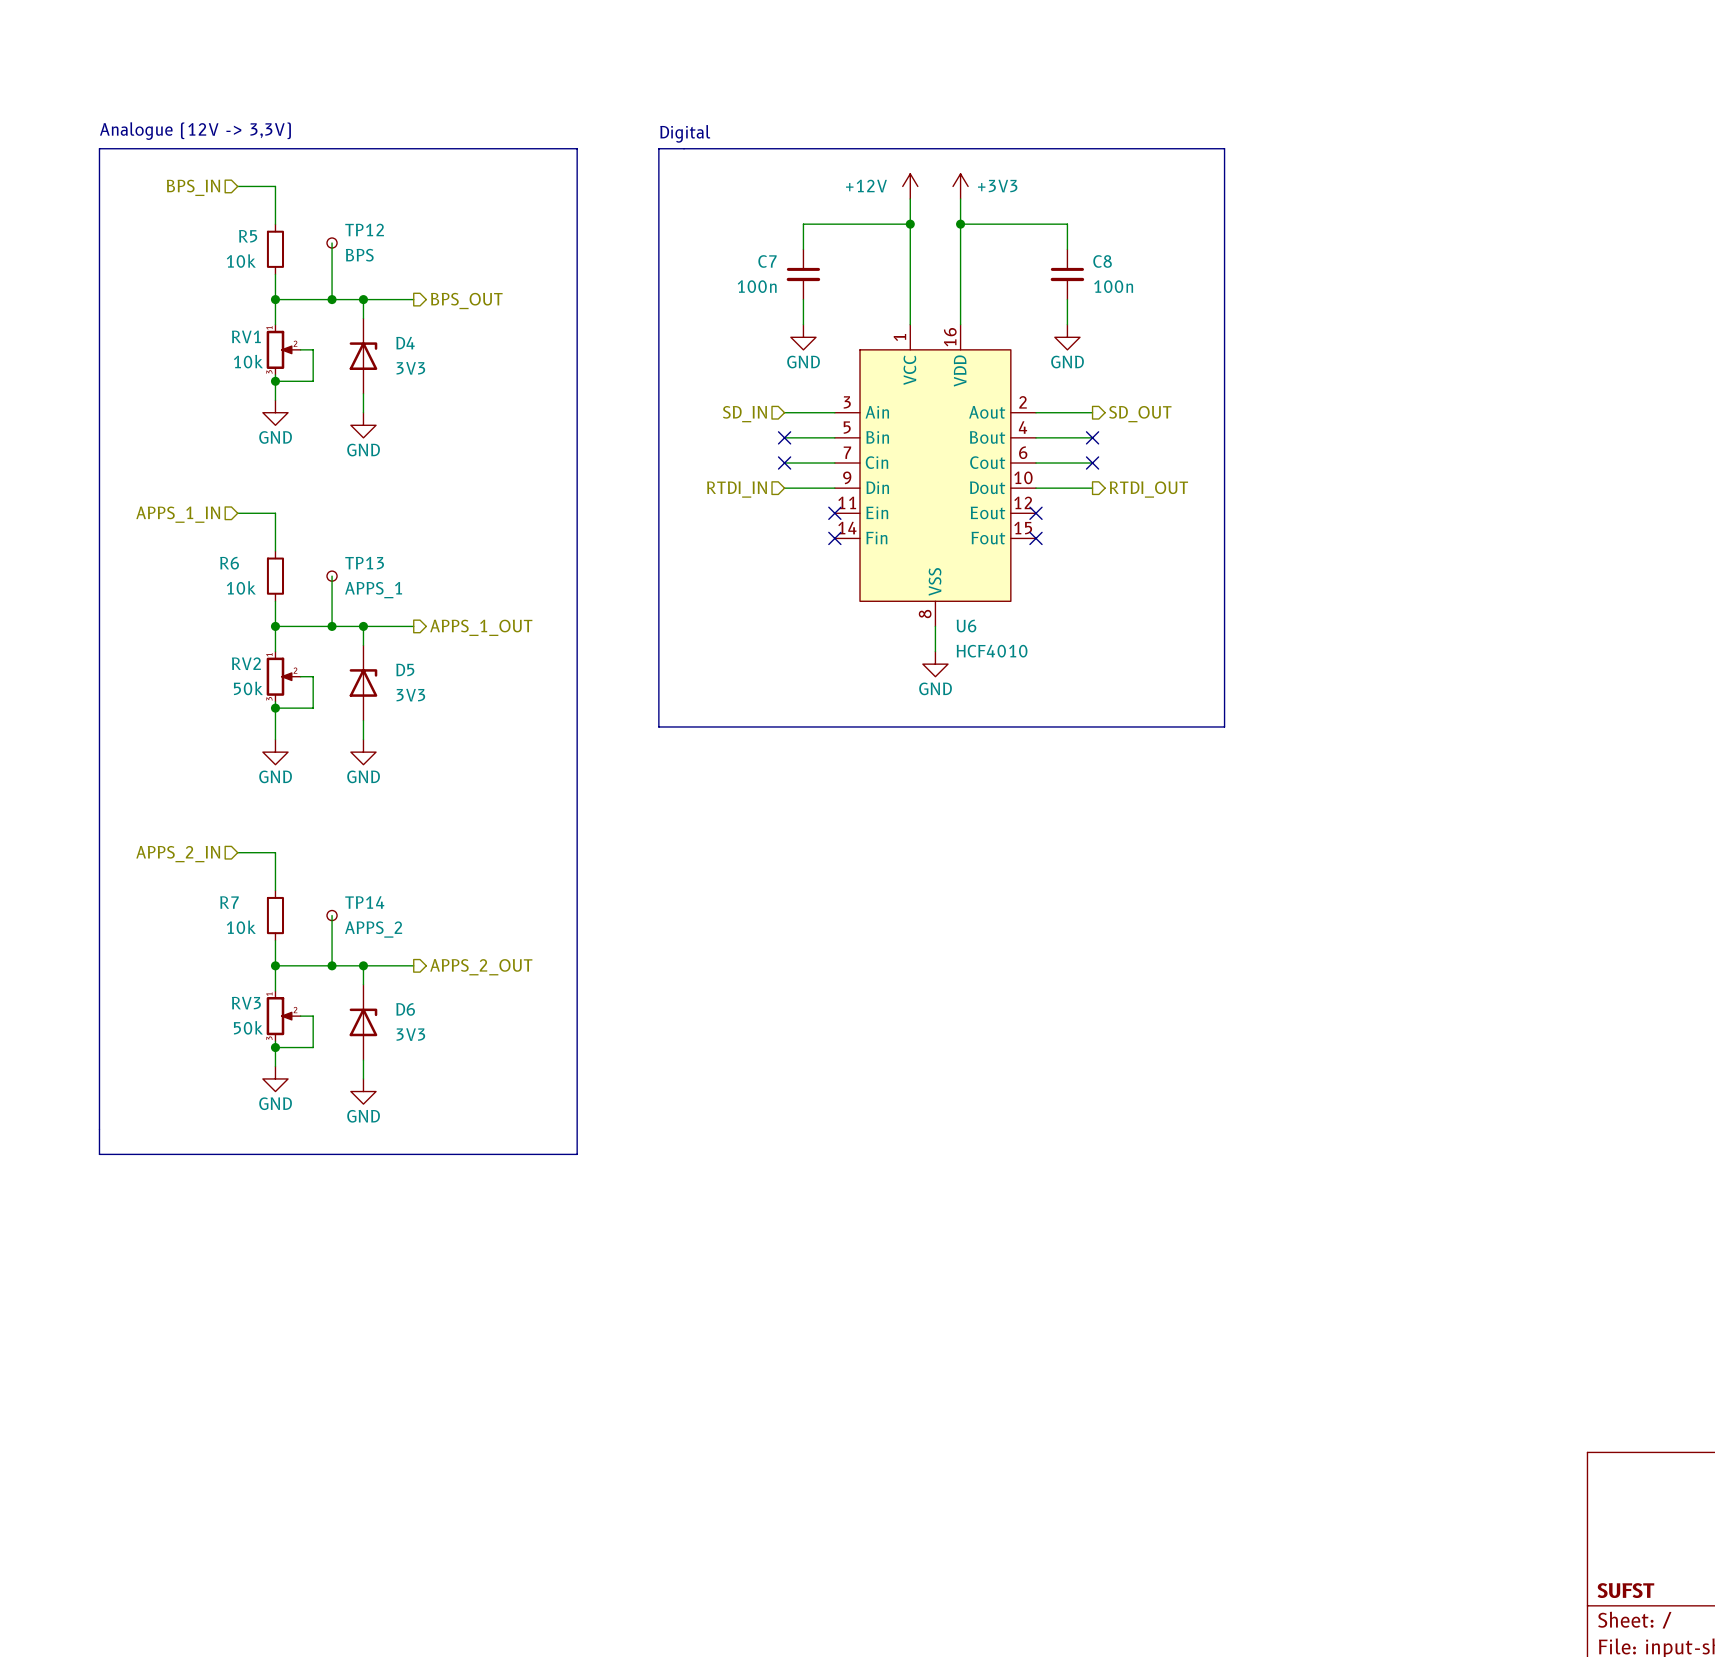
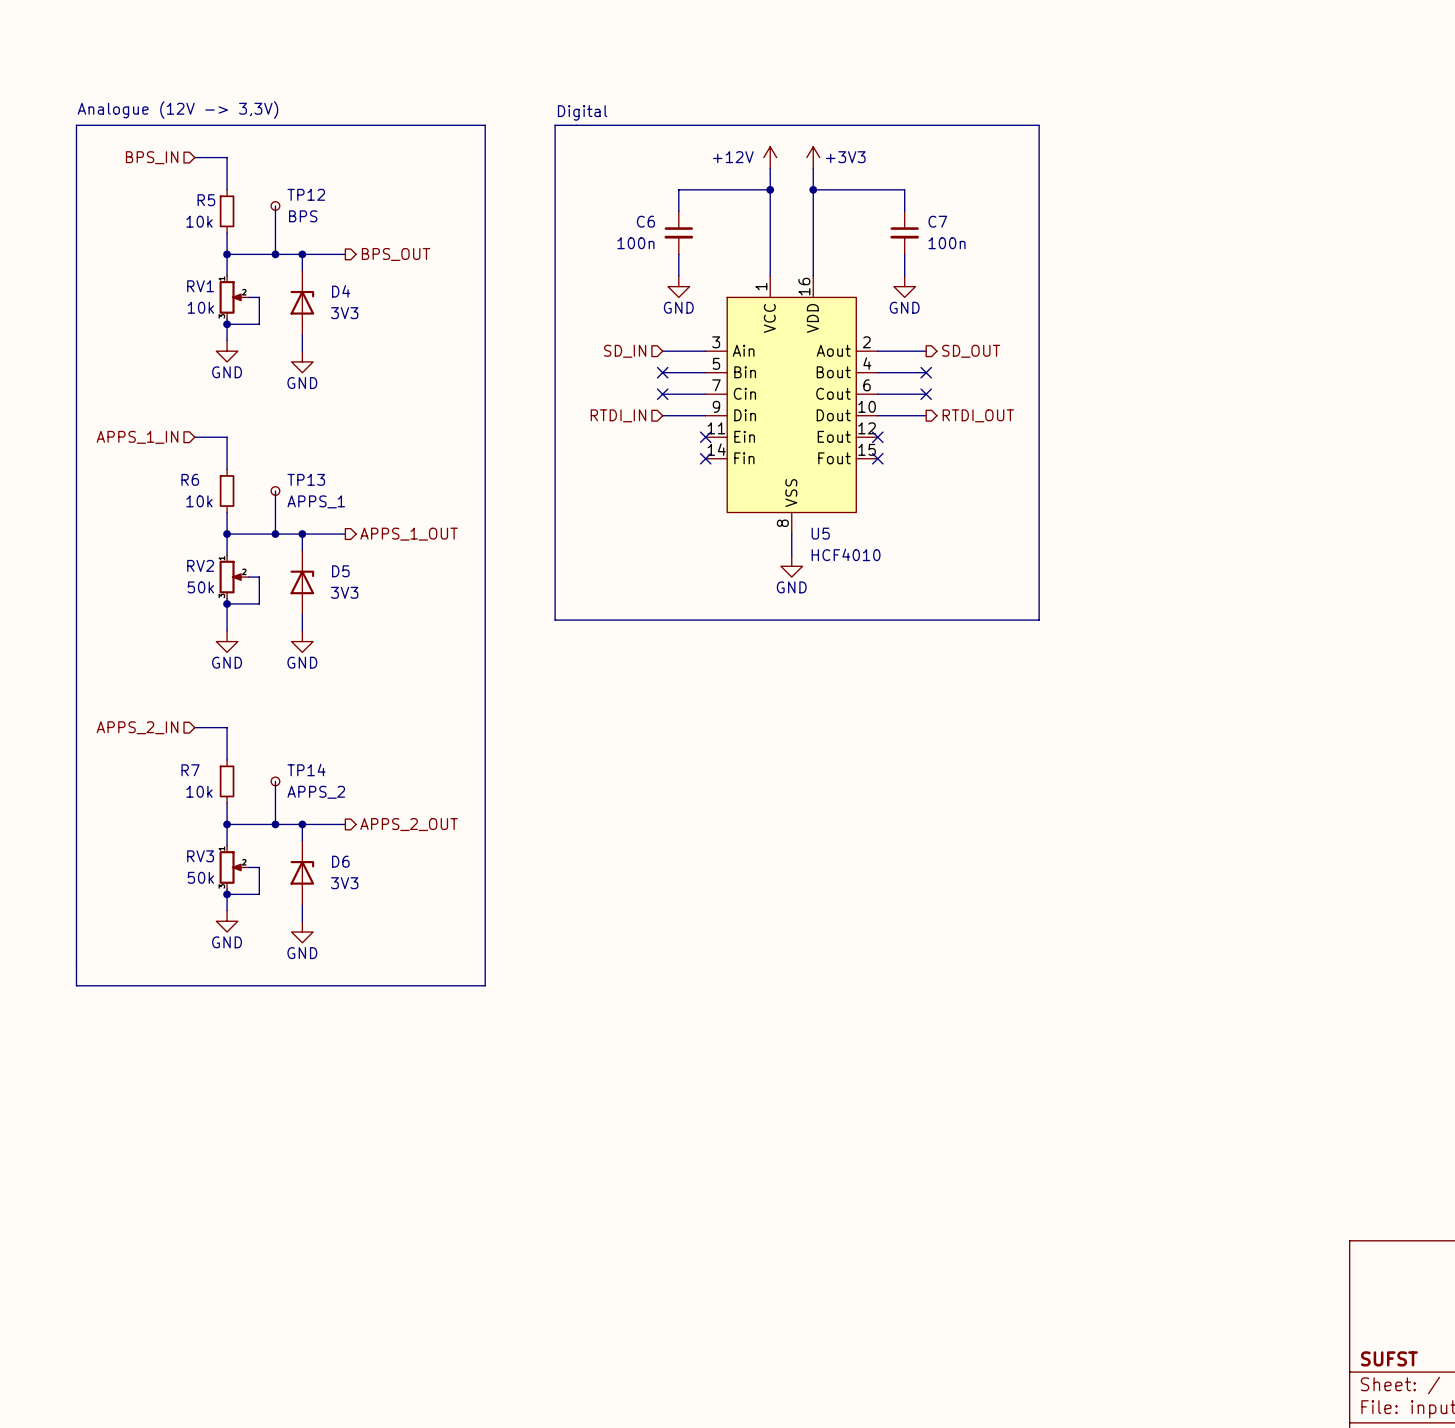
C7 name: C7 (767, 261) -> C6 (645, 221)
C8 name: C8 (1102, 261) -> C7 (937, 221)
U6 name: U6 (966, 626) -> U5 (820, 533)

